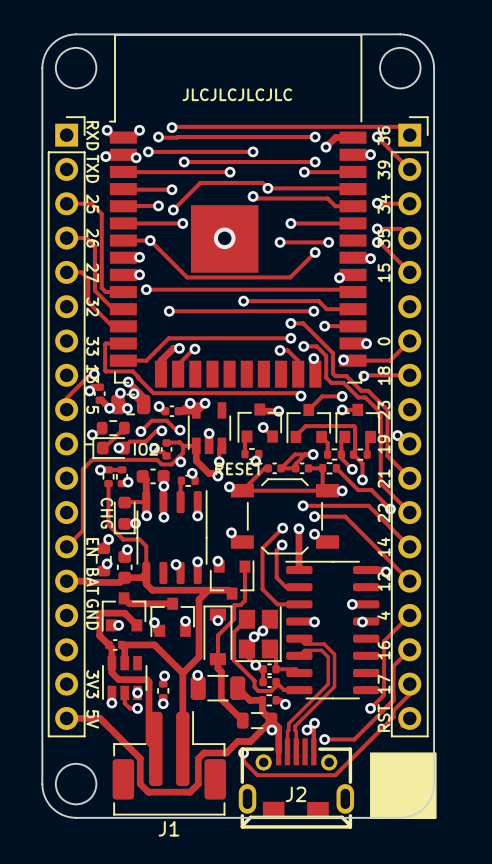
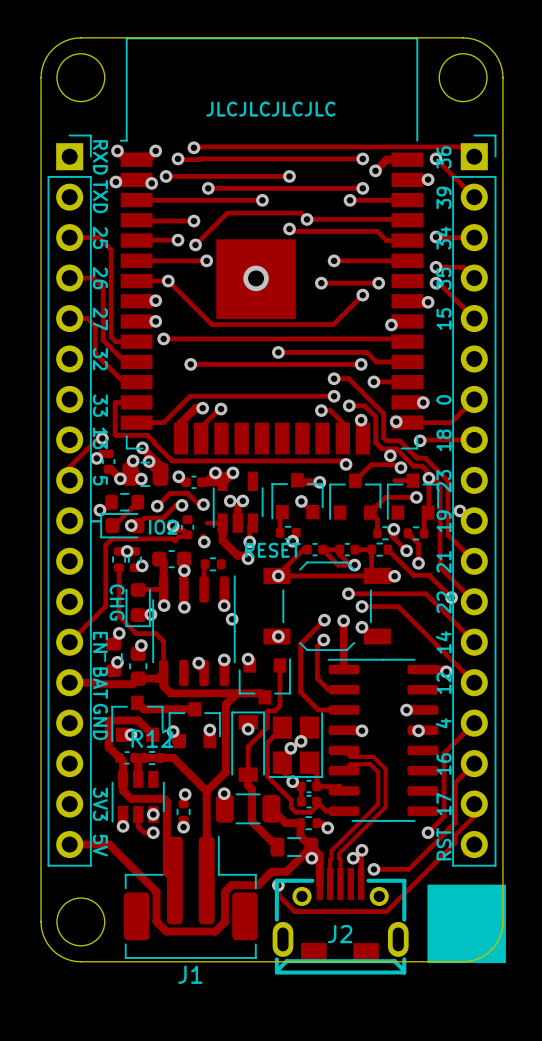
via: none -> (390, 455)
via: (342, 396) -> none
via: none -> (400, 467)
track: none -> (428, 478) (428, 512)
via: none -> (428, 478)
via: (342, 409) -> none
track: none -> (416, 497) (385, 497) (370, 512)
via: none -> (416, 497)
via: none -> (230, 501)
via: none -> (242, 500)
via: (209, 433) -> none
track: (295, 436) (305, 426) (354, 426) (355, 453) (353, 454) -> none
track: (344, 436) (341, 440) (341, 451) -> none
track: (166, 442) (179, 442) (183, 445) (183, 452) (171, 464) (161, 464) (157, 459) (92, 459) (82, 469) (82, 530) -> (182, 536) (178, 536) (174, 540) (172, 538) (112, 538) (105, 545) (105, 606) (88, 623)
via: none -> (393, 529)
track: (305, 454) (295, 464) (295, 468) -> (350, 565) (339, 554) (339, 549)
track: (313, 454) (294, 454) (281, 468) -> (354, 565) (338, 565) (322, 549)
via: (313, 454) -> none
via position: (100, 470) -> (127, 551)
via: (192, 473) -> none
via: none -> (354, 565)
via position: (229, 486) -> (278, 575)
via: none -> (232, 619)
via: (231, 532) -> none
via: none -> (278, 636)
R12: none -> (152, 758)

